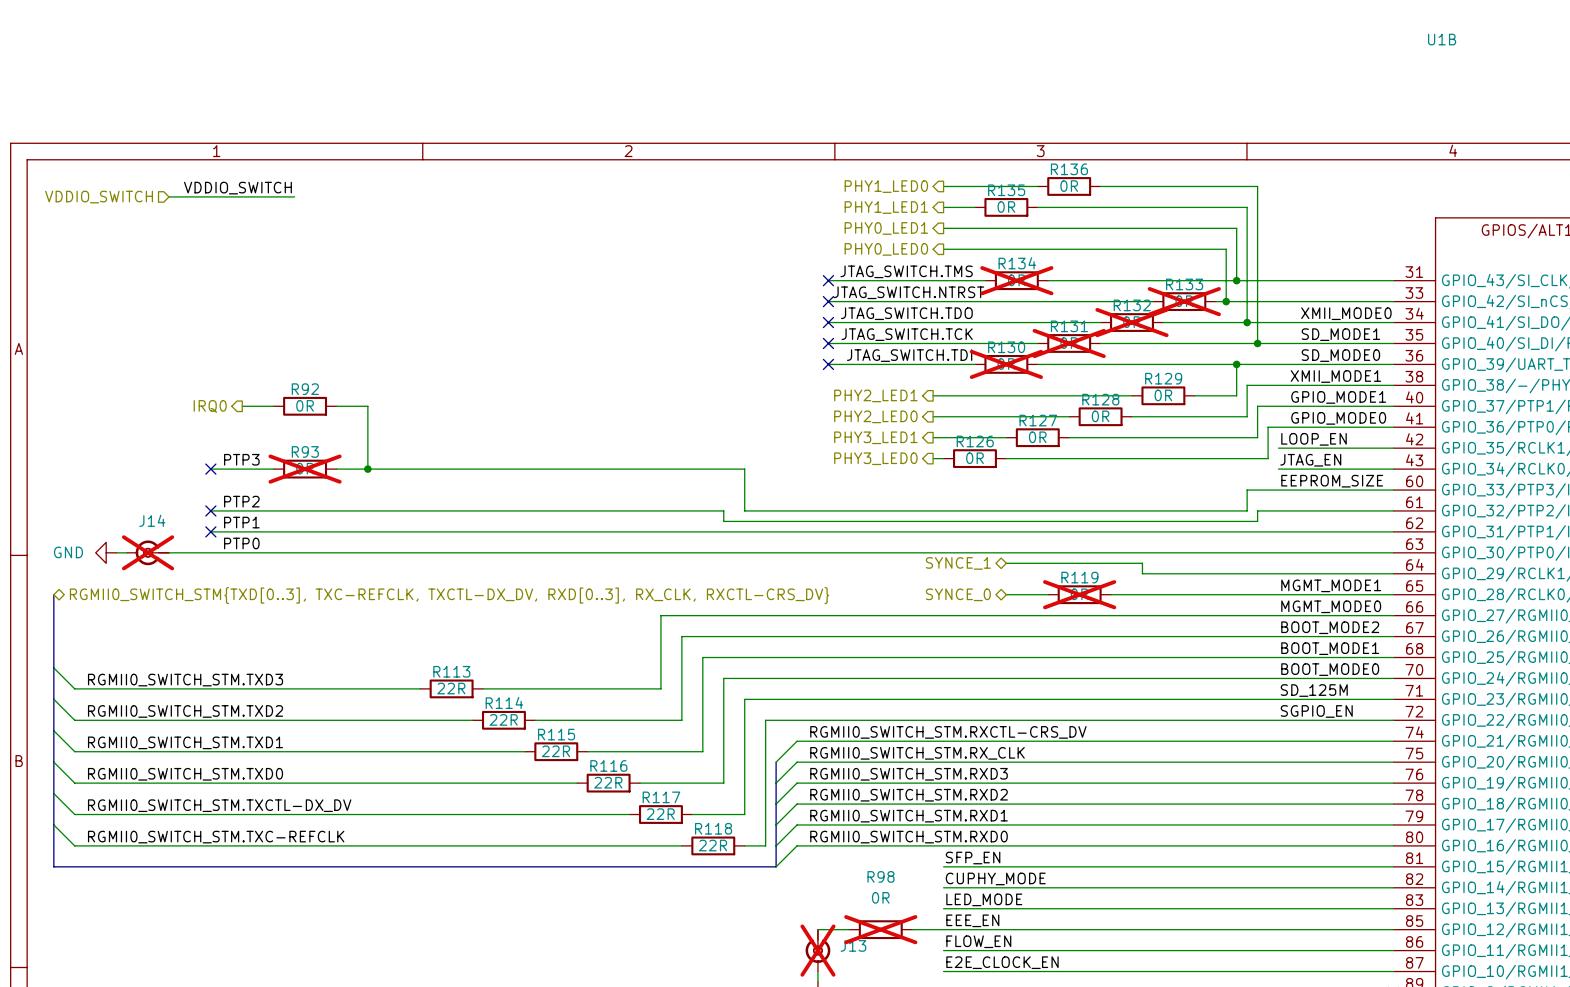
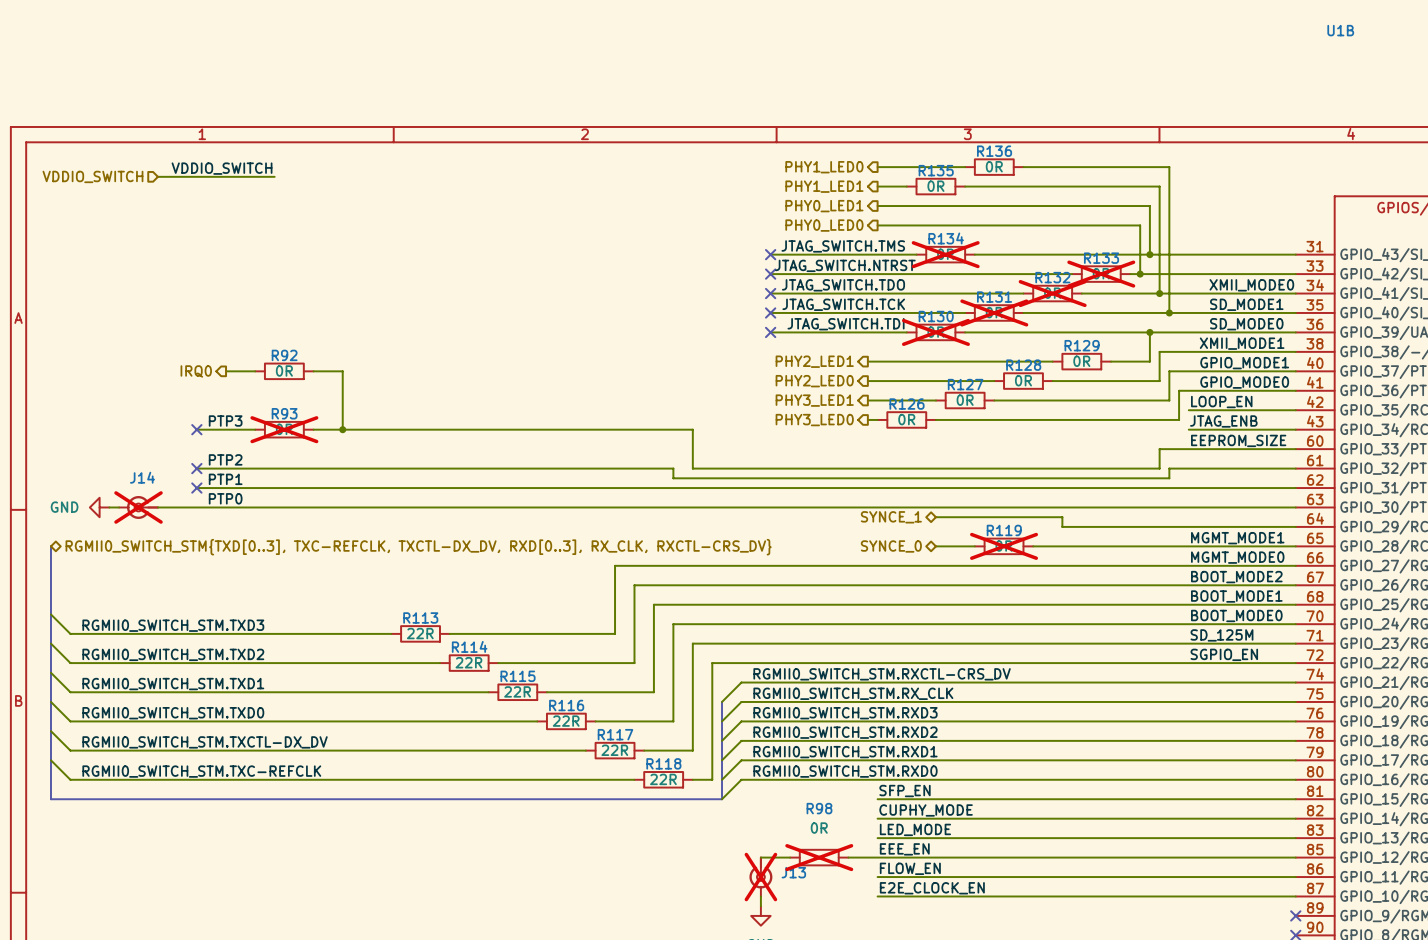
label: JTAG_EN (1310, 460) -> JTAG_ENB (1223, 421)

